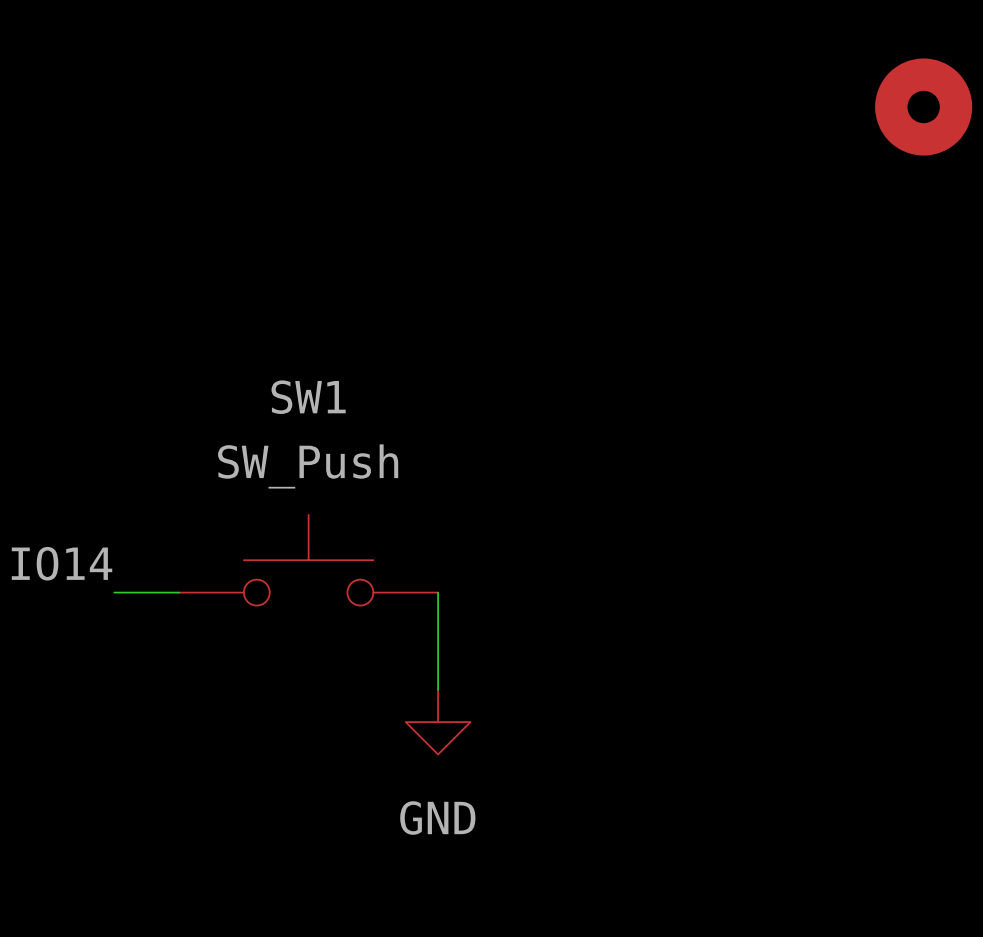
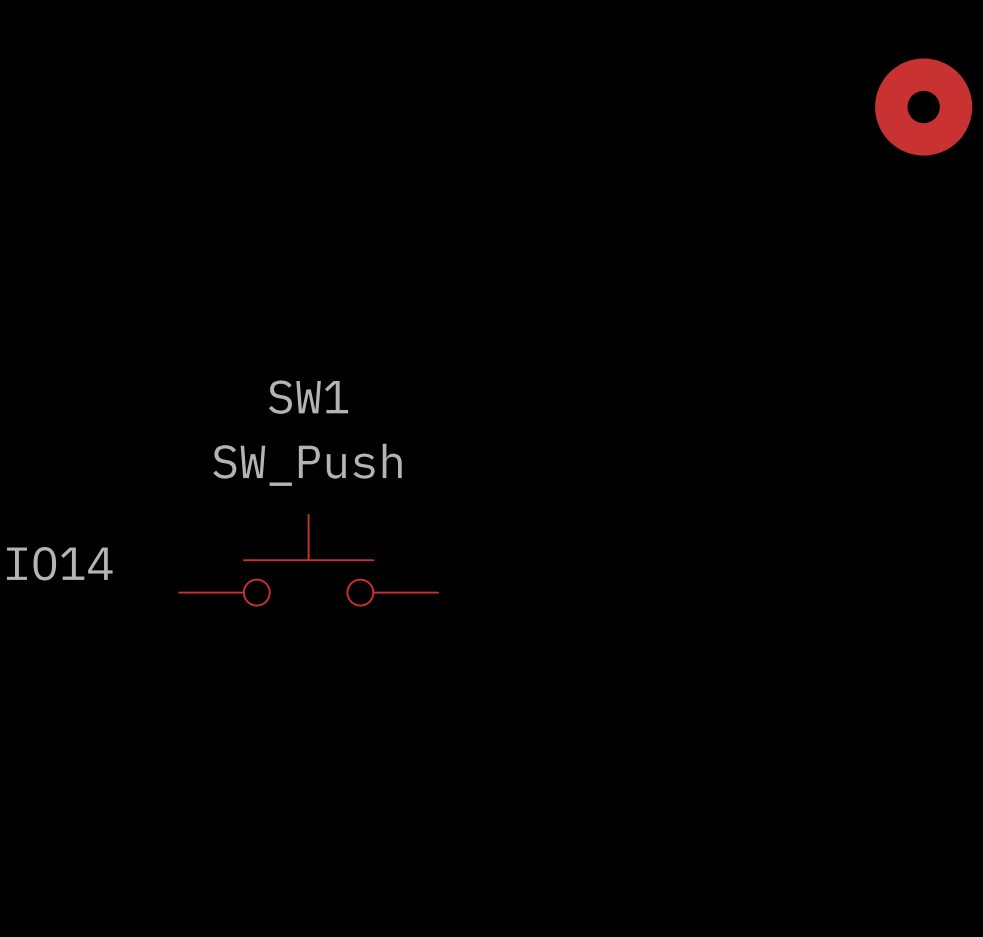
wire: (114, 592) (179, 592) -> none
wire: (438, 592) (438, 689) -> none
power symbol: GND (438, 722) -> none

